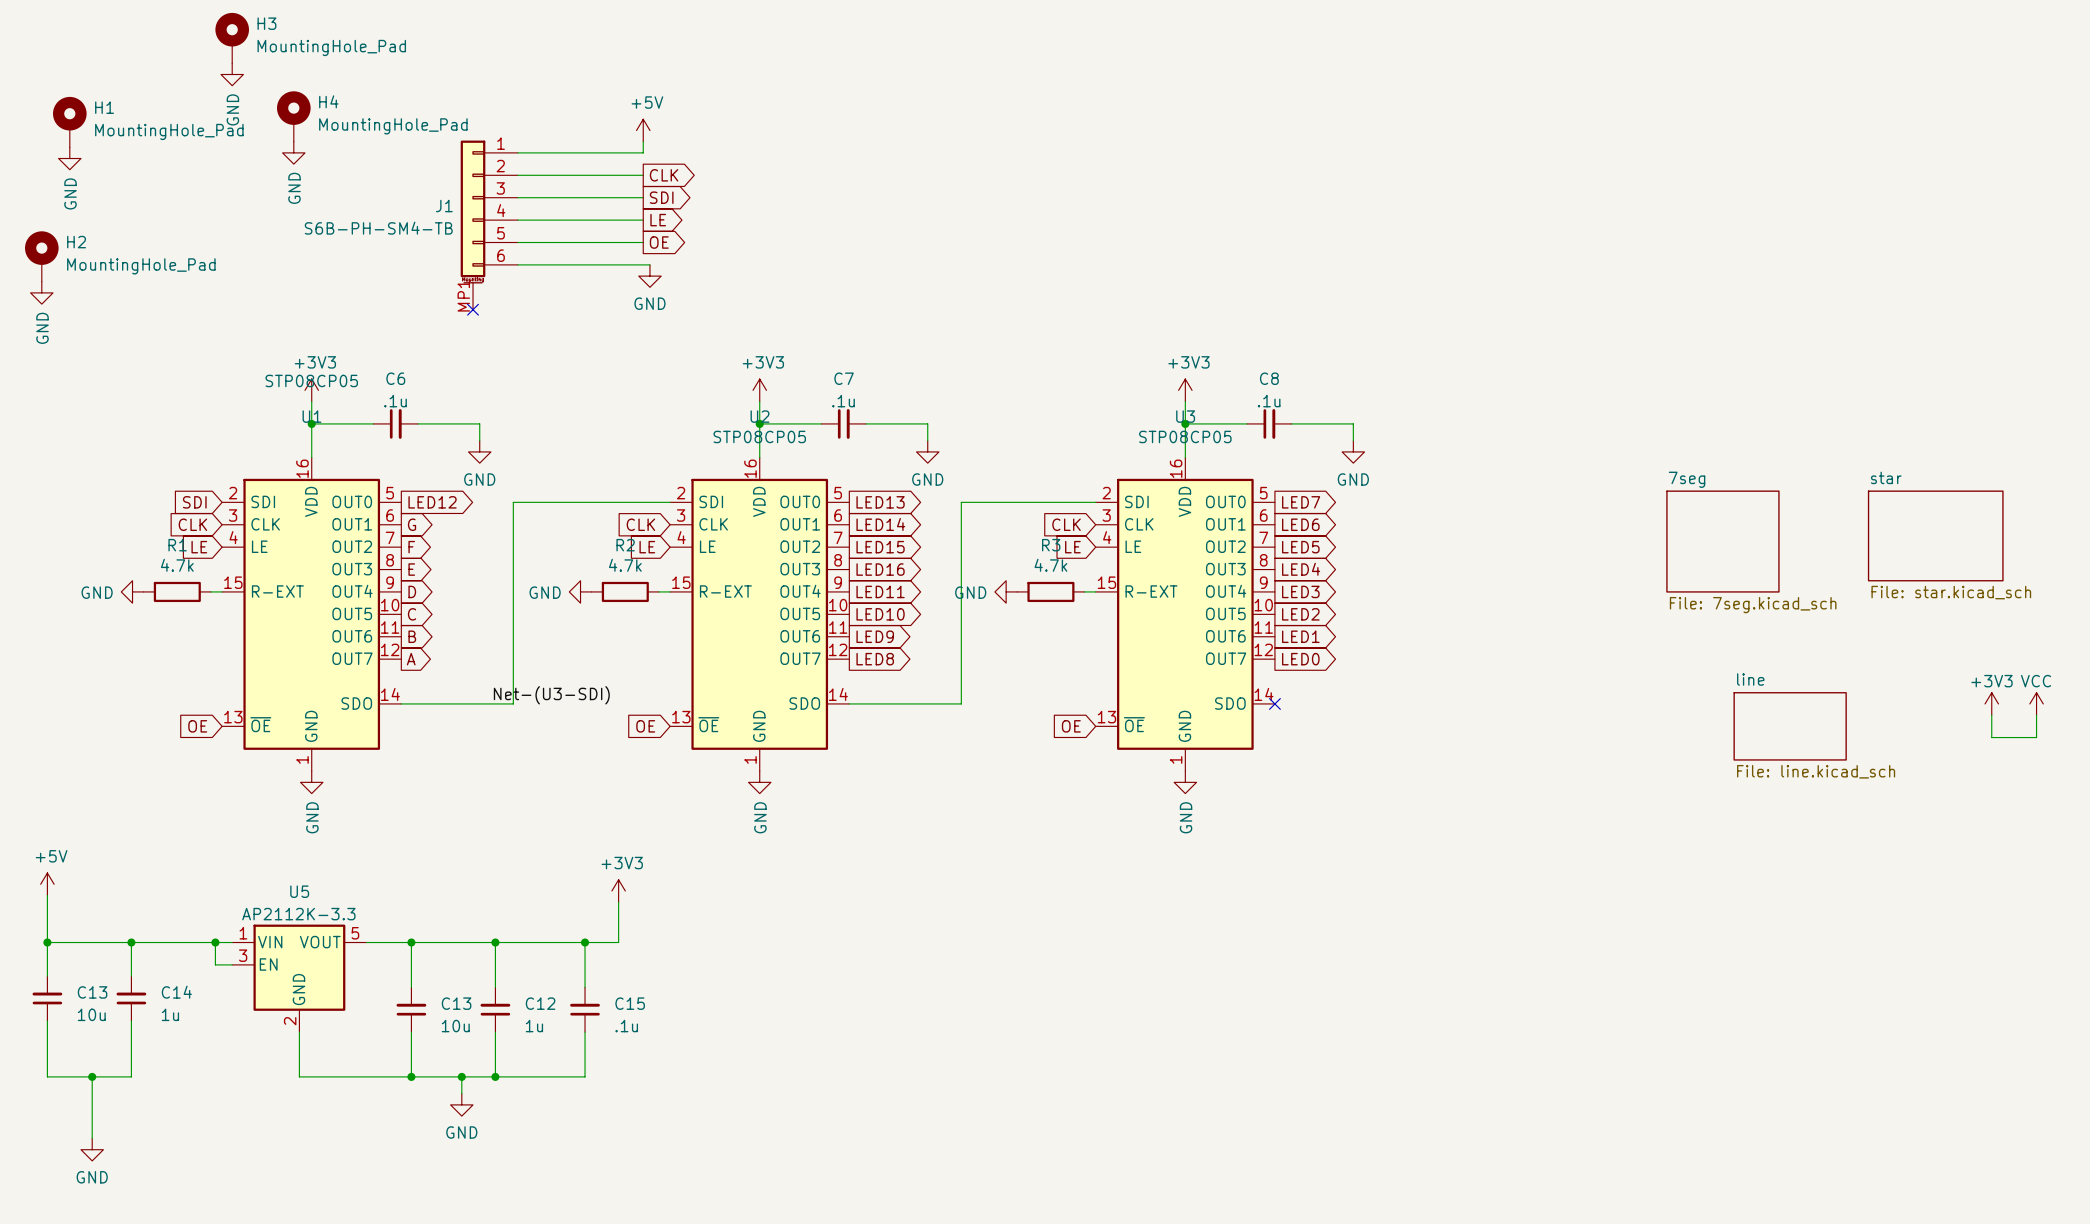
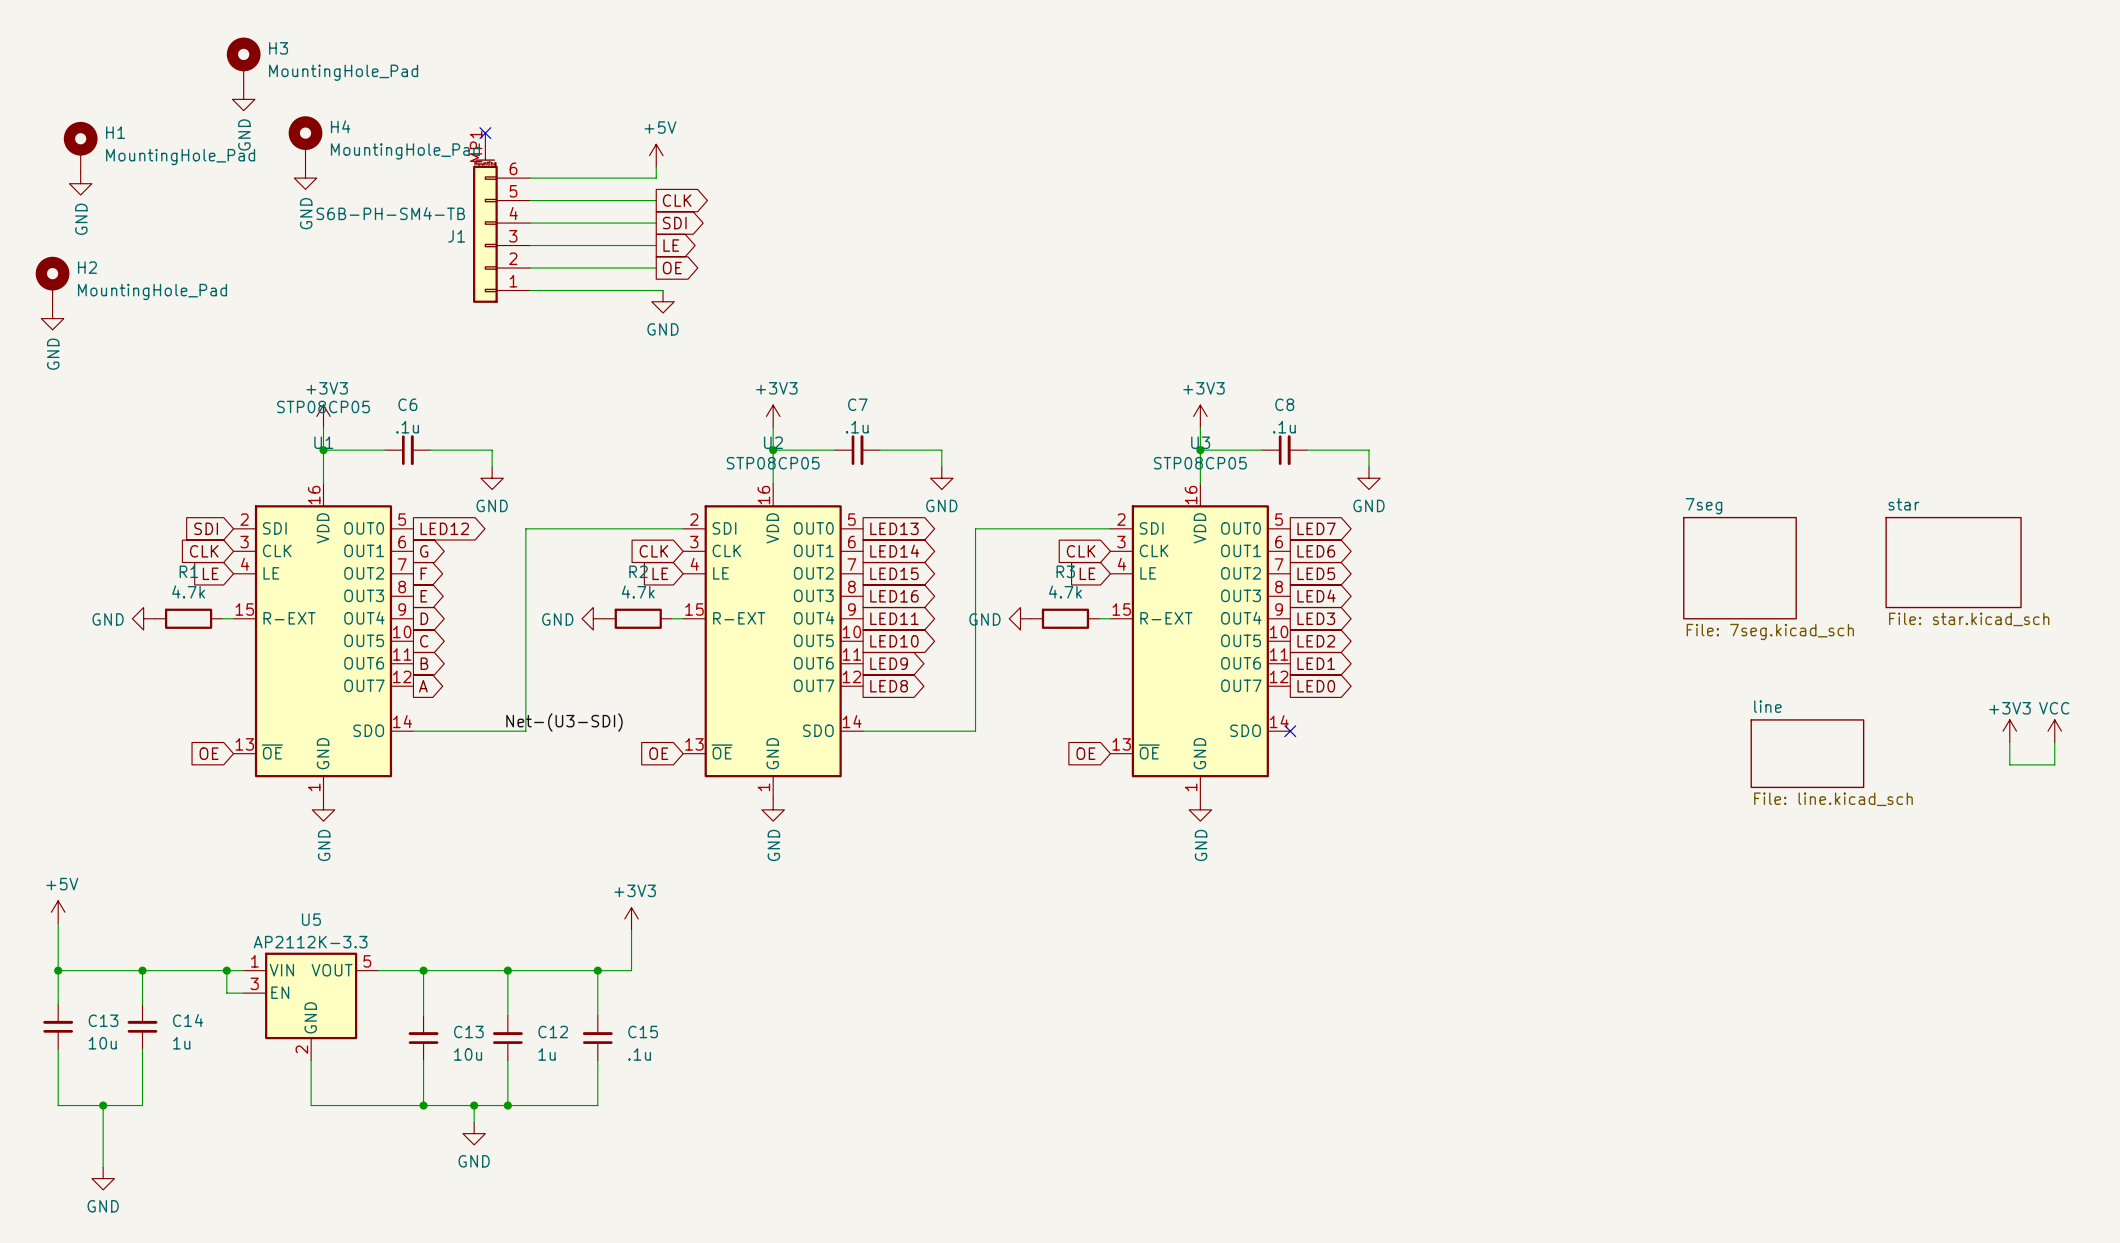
no-connect mark: none -> (485, 133)
J1 flip: as is (473, 212) -> up-down (485, 231)
no-connect mark: (473, 309) -> none

